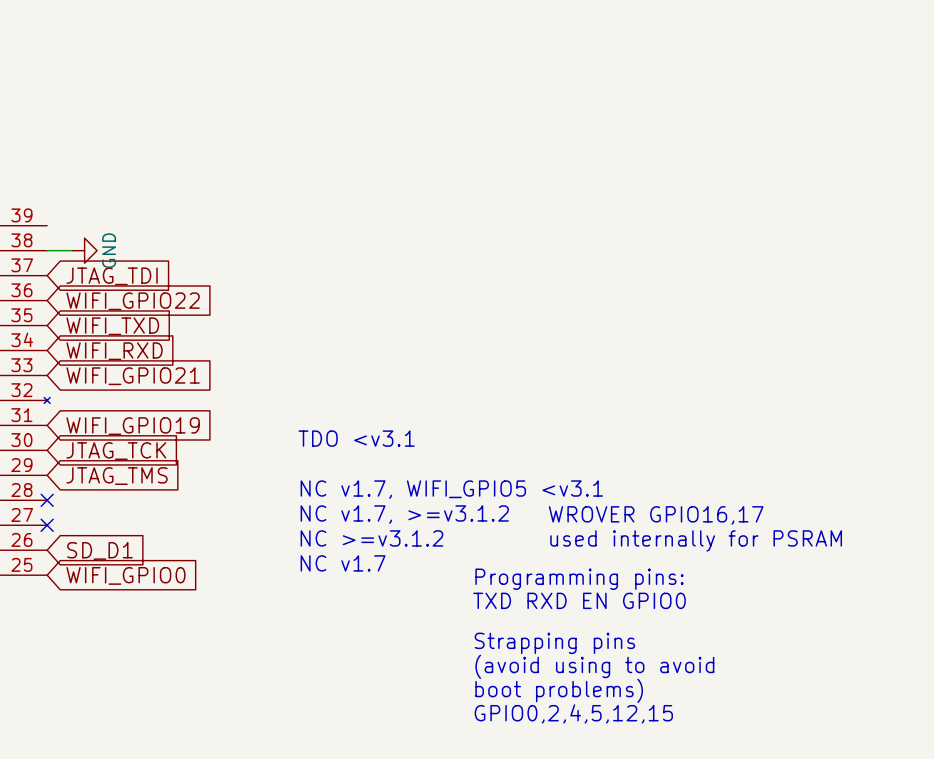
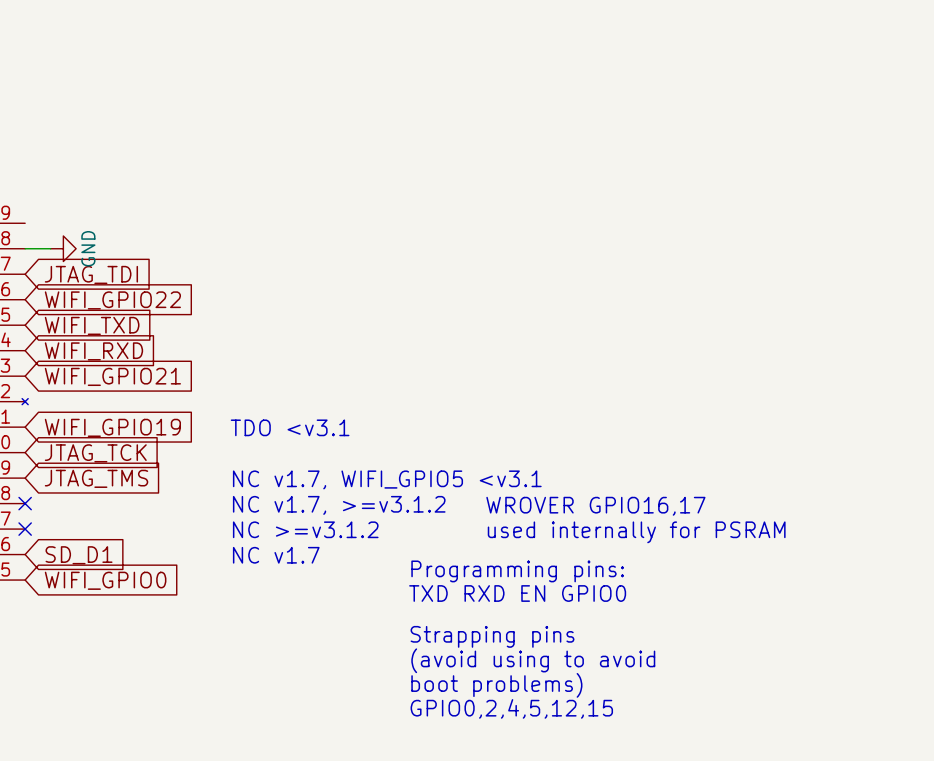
text position: TDO <v3.1 (356, 438) -> TDO <v3.1 (290, 427)
text position: NC v1.7, WIFI_GPIO5 <v3.1 (451, 489) -> NC v1.7, WIFI_GPIO5 <v3.1 (387, 479)
text position: NC v1.7, >=v3.1.2 (404, 514) -> NC v1.7, >=v3.1.2 (339, 505)
text position: WROVER GPIO16,17 (656, 515) -> WROVER GPIO16,17 (595, 506)
text position: NC >=v3.1.2 (371, 538) -> NC >=v3.1.2 (305, 529)
text position: used internally for PSRAM (696, 540) -> used internally for PSRAM (636, 532)
text position: NC v1.7 (343, 563) -> NC v1.7 (276, 555)
text position: Programming pins: (579, 579) -> Programming pins: (517, 571)
text position: TXD RXD EN GPIO0 (579, 600) -> TXD RXD EN GPIO0 (517, 593)
text position: Strapping pins (554, 643) -> Strapping pins (492, 636)
text position: (avoid using to avoid (594, 666) -> (avoid using to avoid (533, 660)
text position: boot problems) (559, 690) -> boot problems) (496, 685)
text position: GPIO0,2,4,5,12,15 (573, 713) -> GPIO0,2,4,5,12,15 (511, 708)

